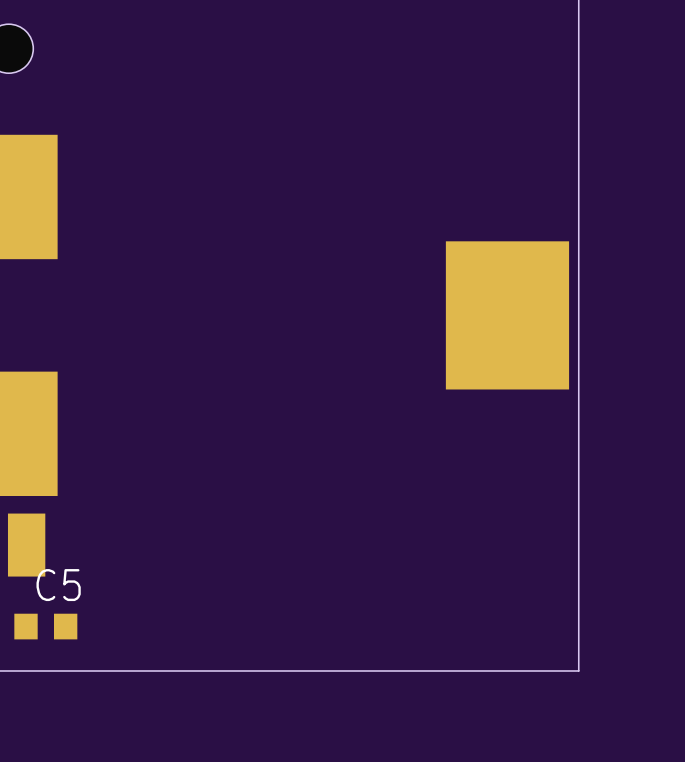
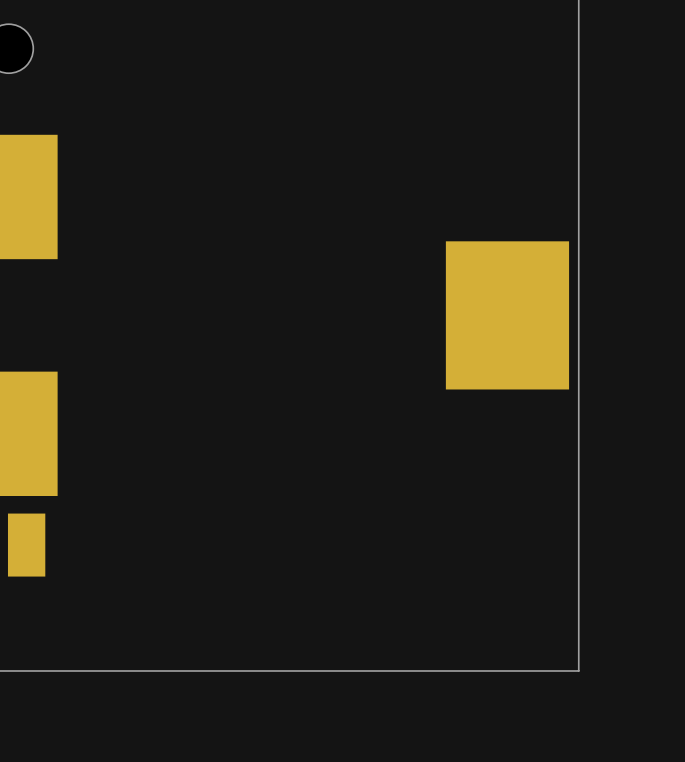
C5: (45, 626) -> none

